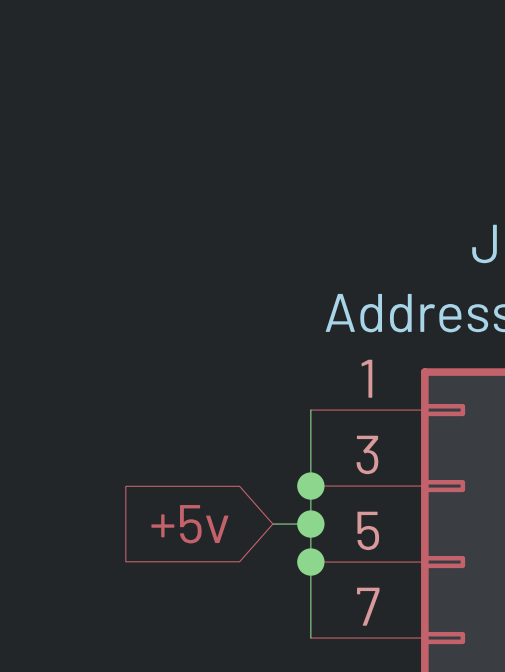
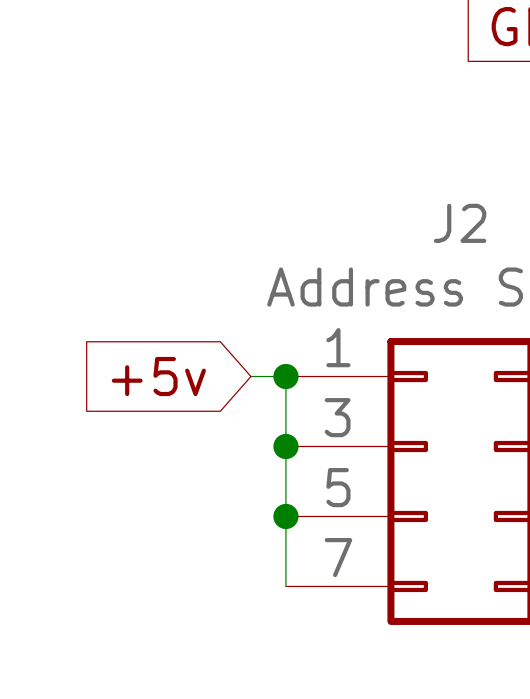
global label position: +5v (189, 524) -> +5v (158, 376)
wire: (272, 524) (310, 524) -> (250, 376) (285, 376)
junction position: (310, 524) -> (285, 376)

